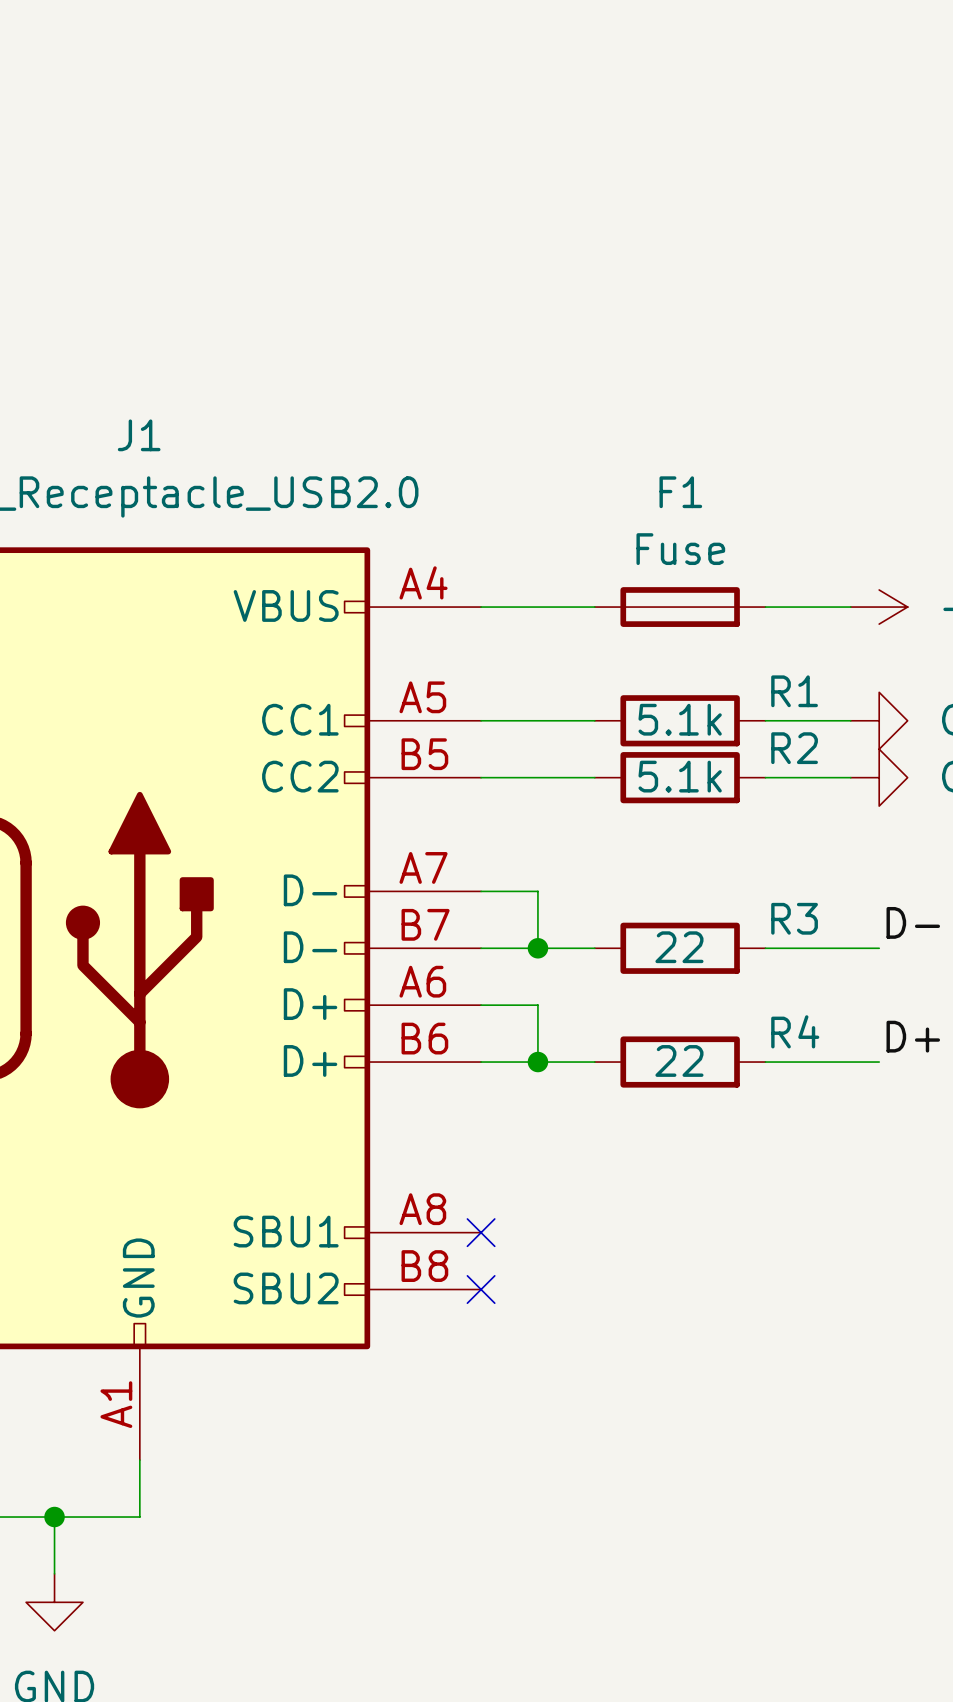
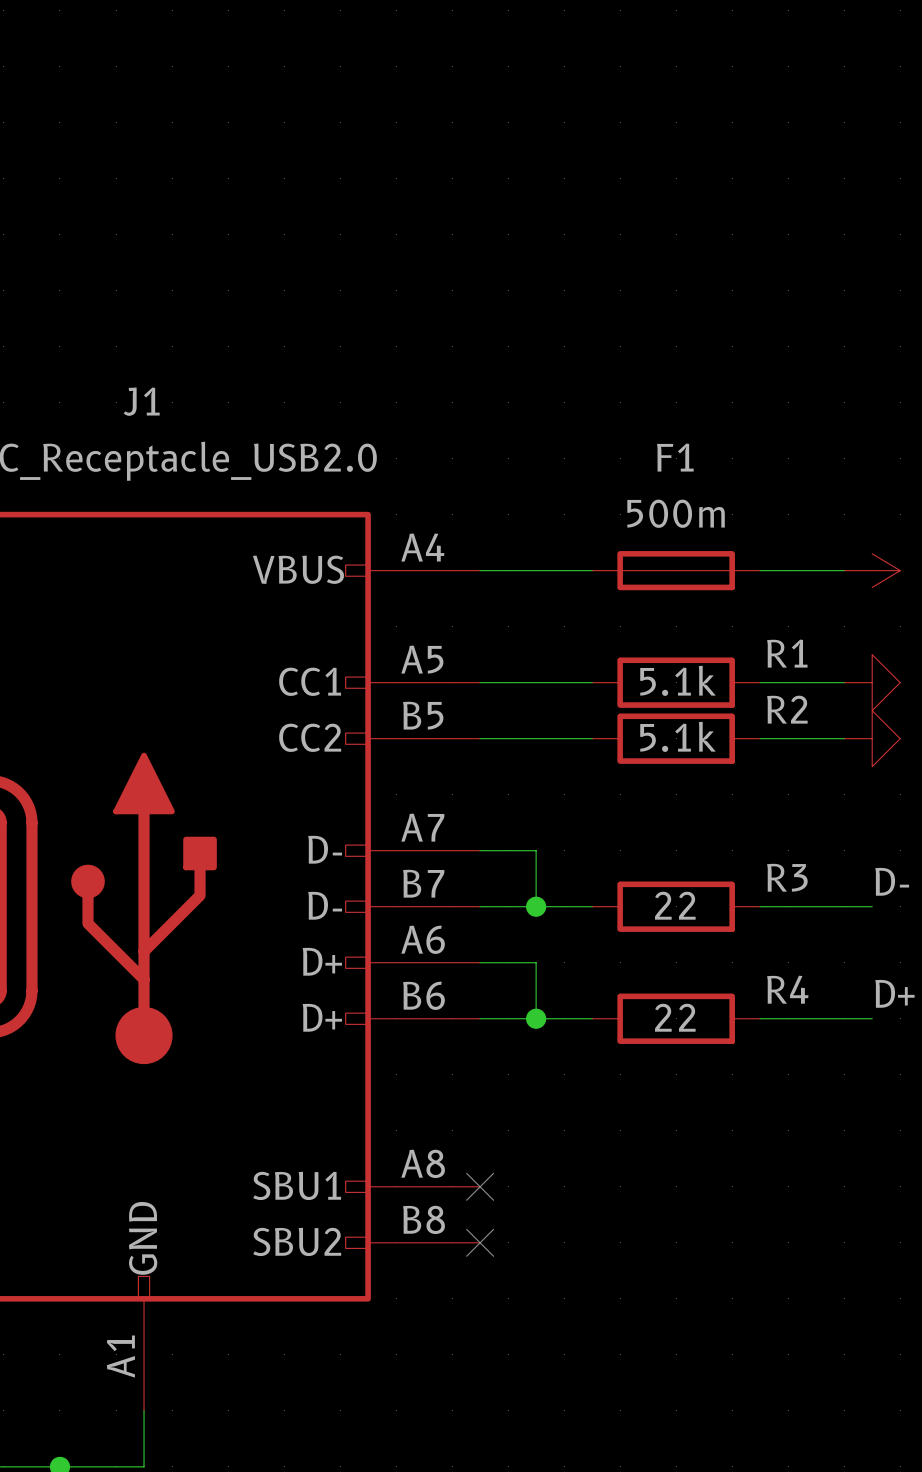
F1 value: Fuse (680, 549) -> 500m (676, 513)

